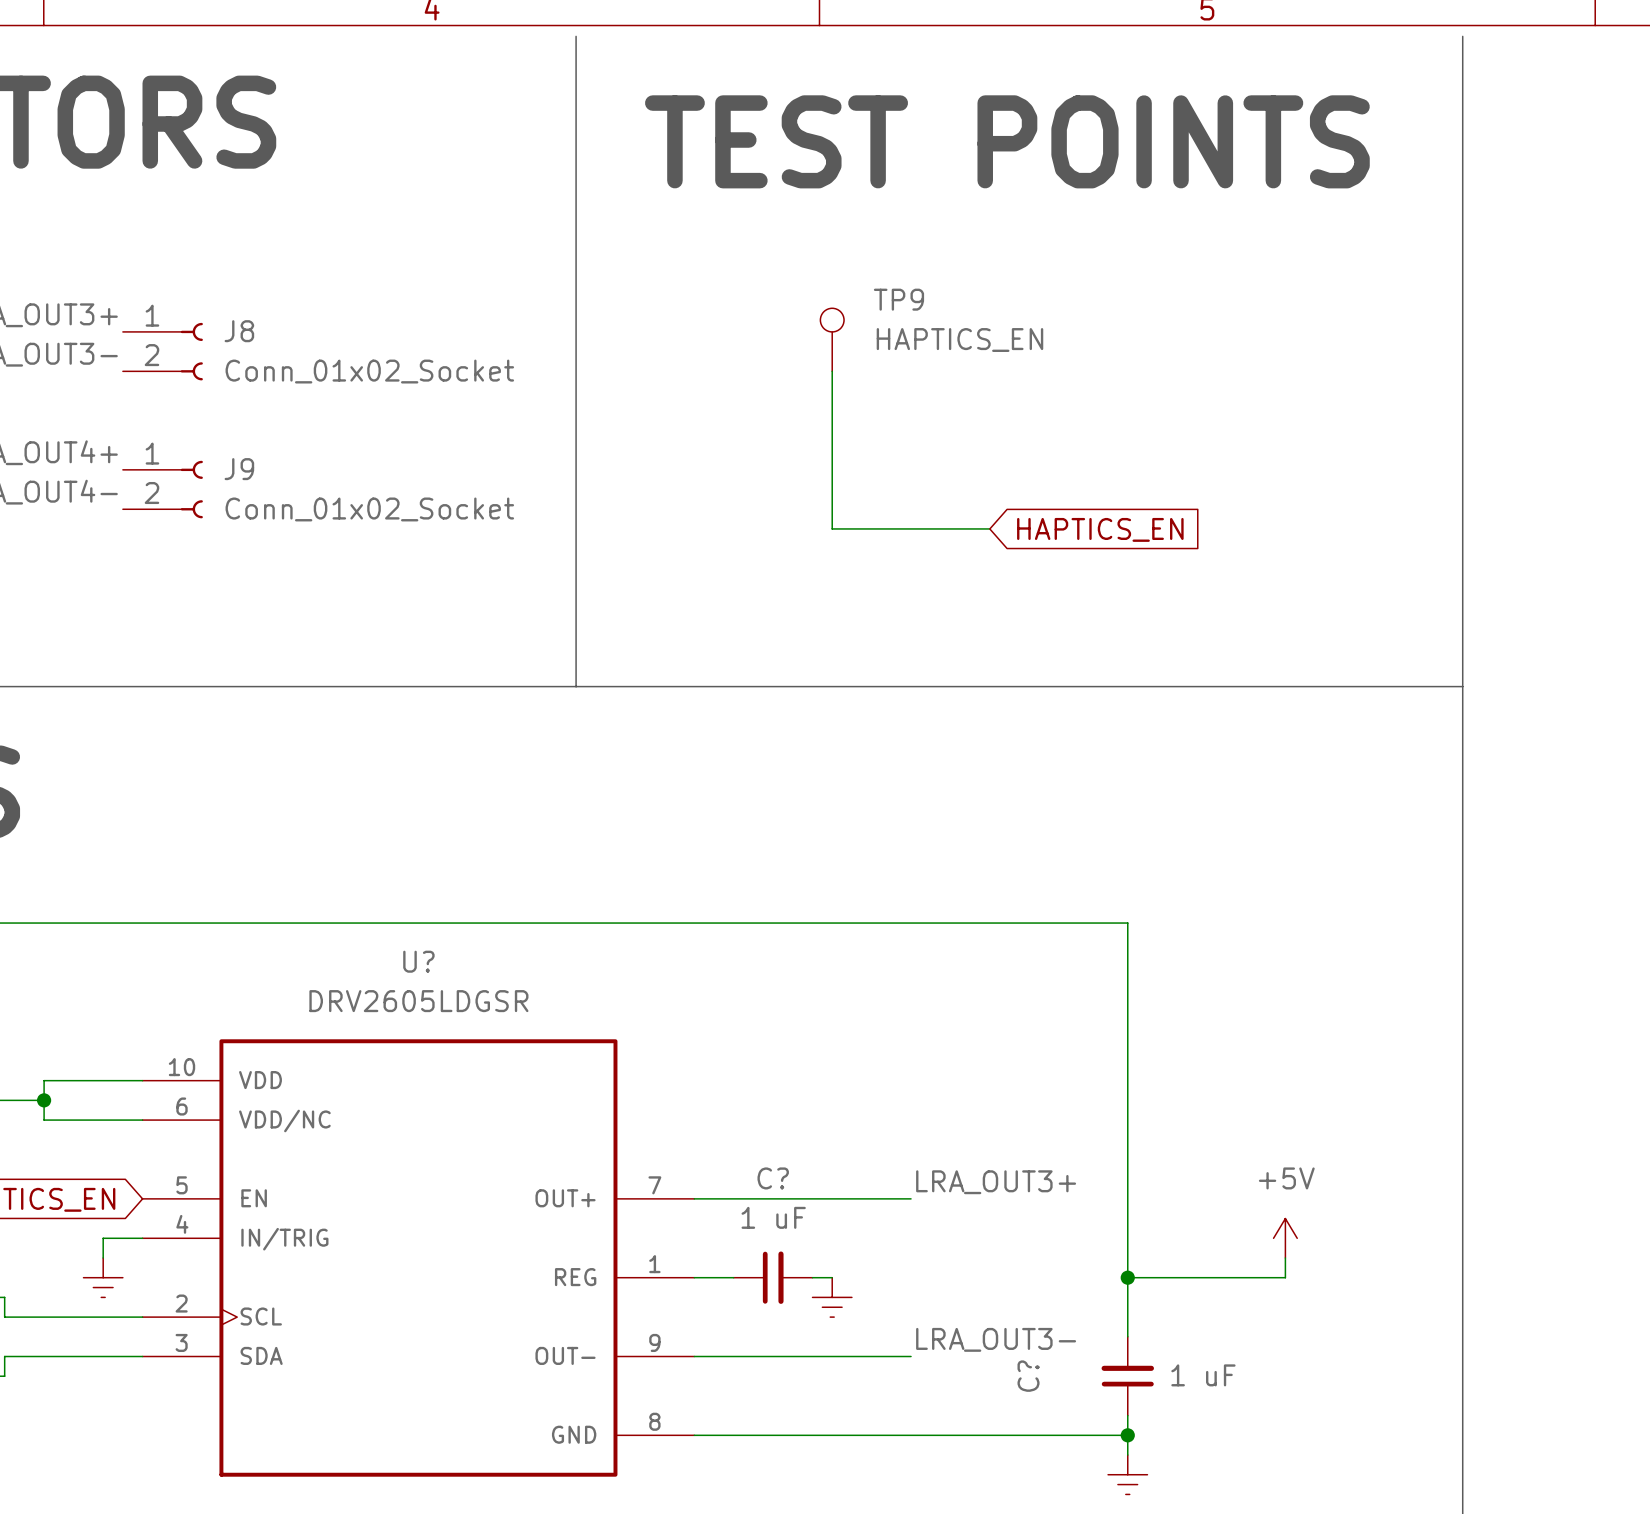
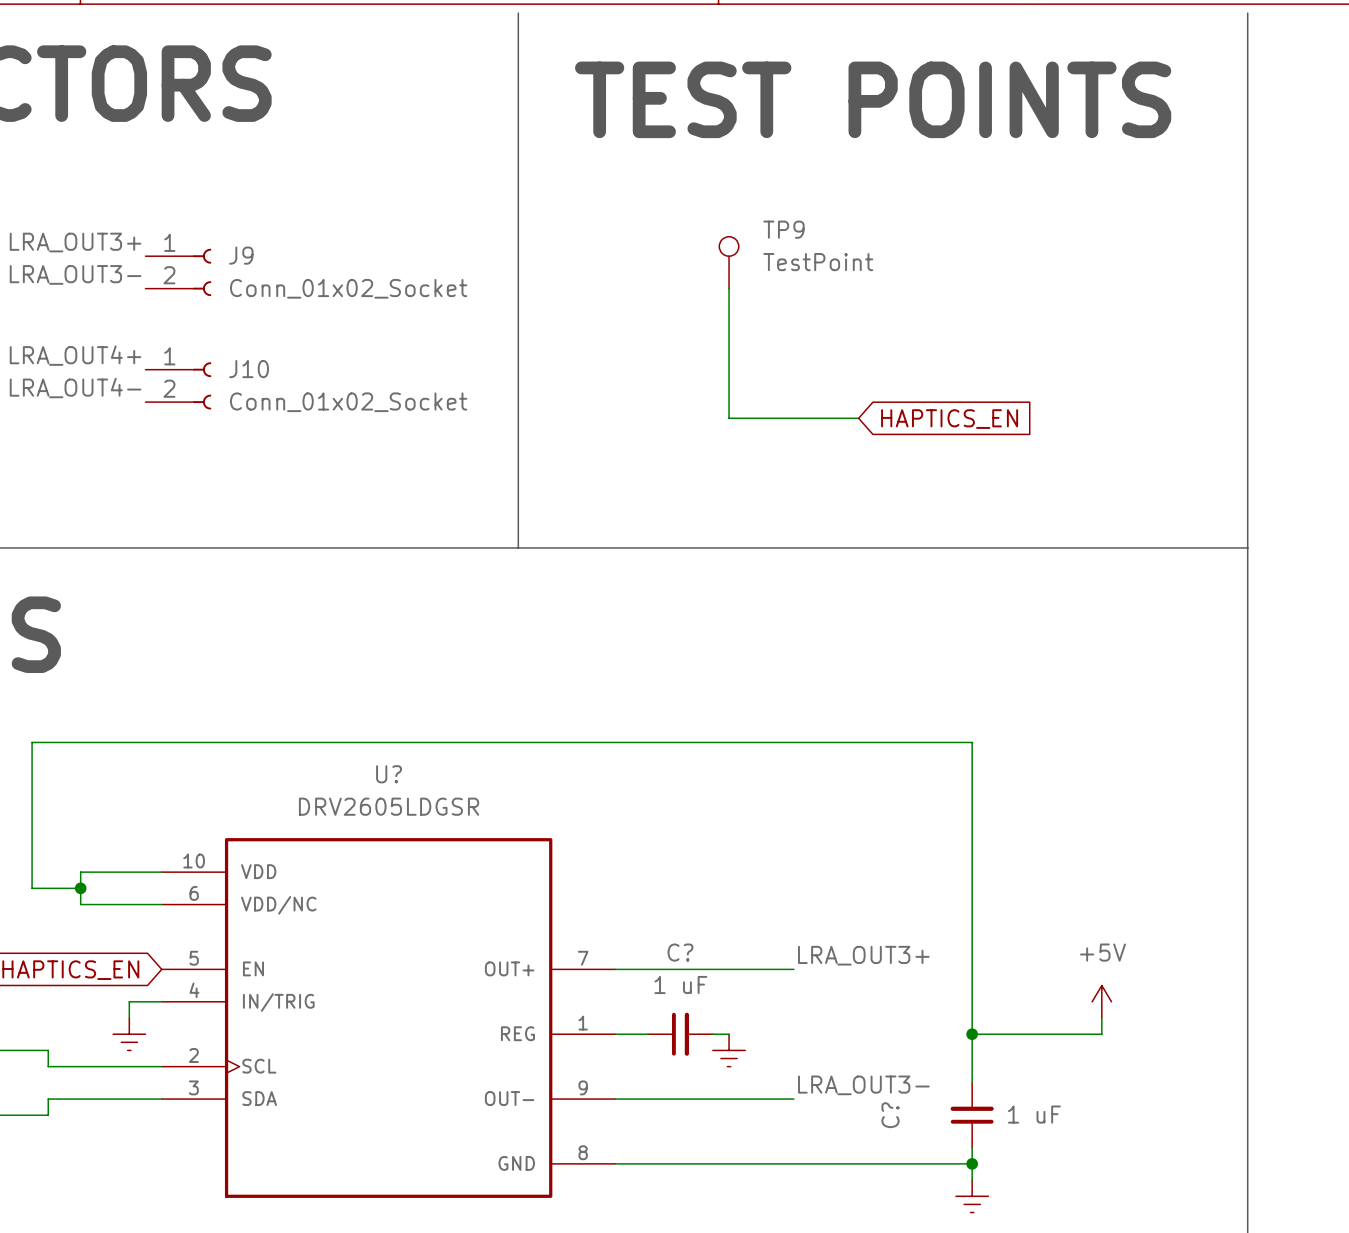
J8 name: J8 (239, 331) -> J9 (241, 255)
TP9 value: HAPTICS_EN (959, 340) -> TestPoint (818, 262)
J9 name: J9 (239, 469) -> J10 (249, 369)

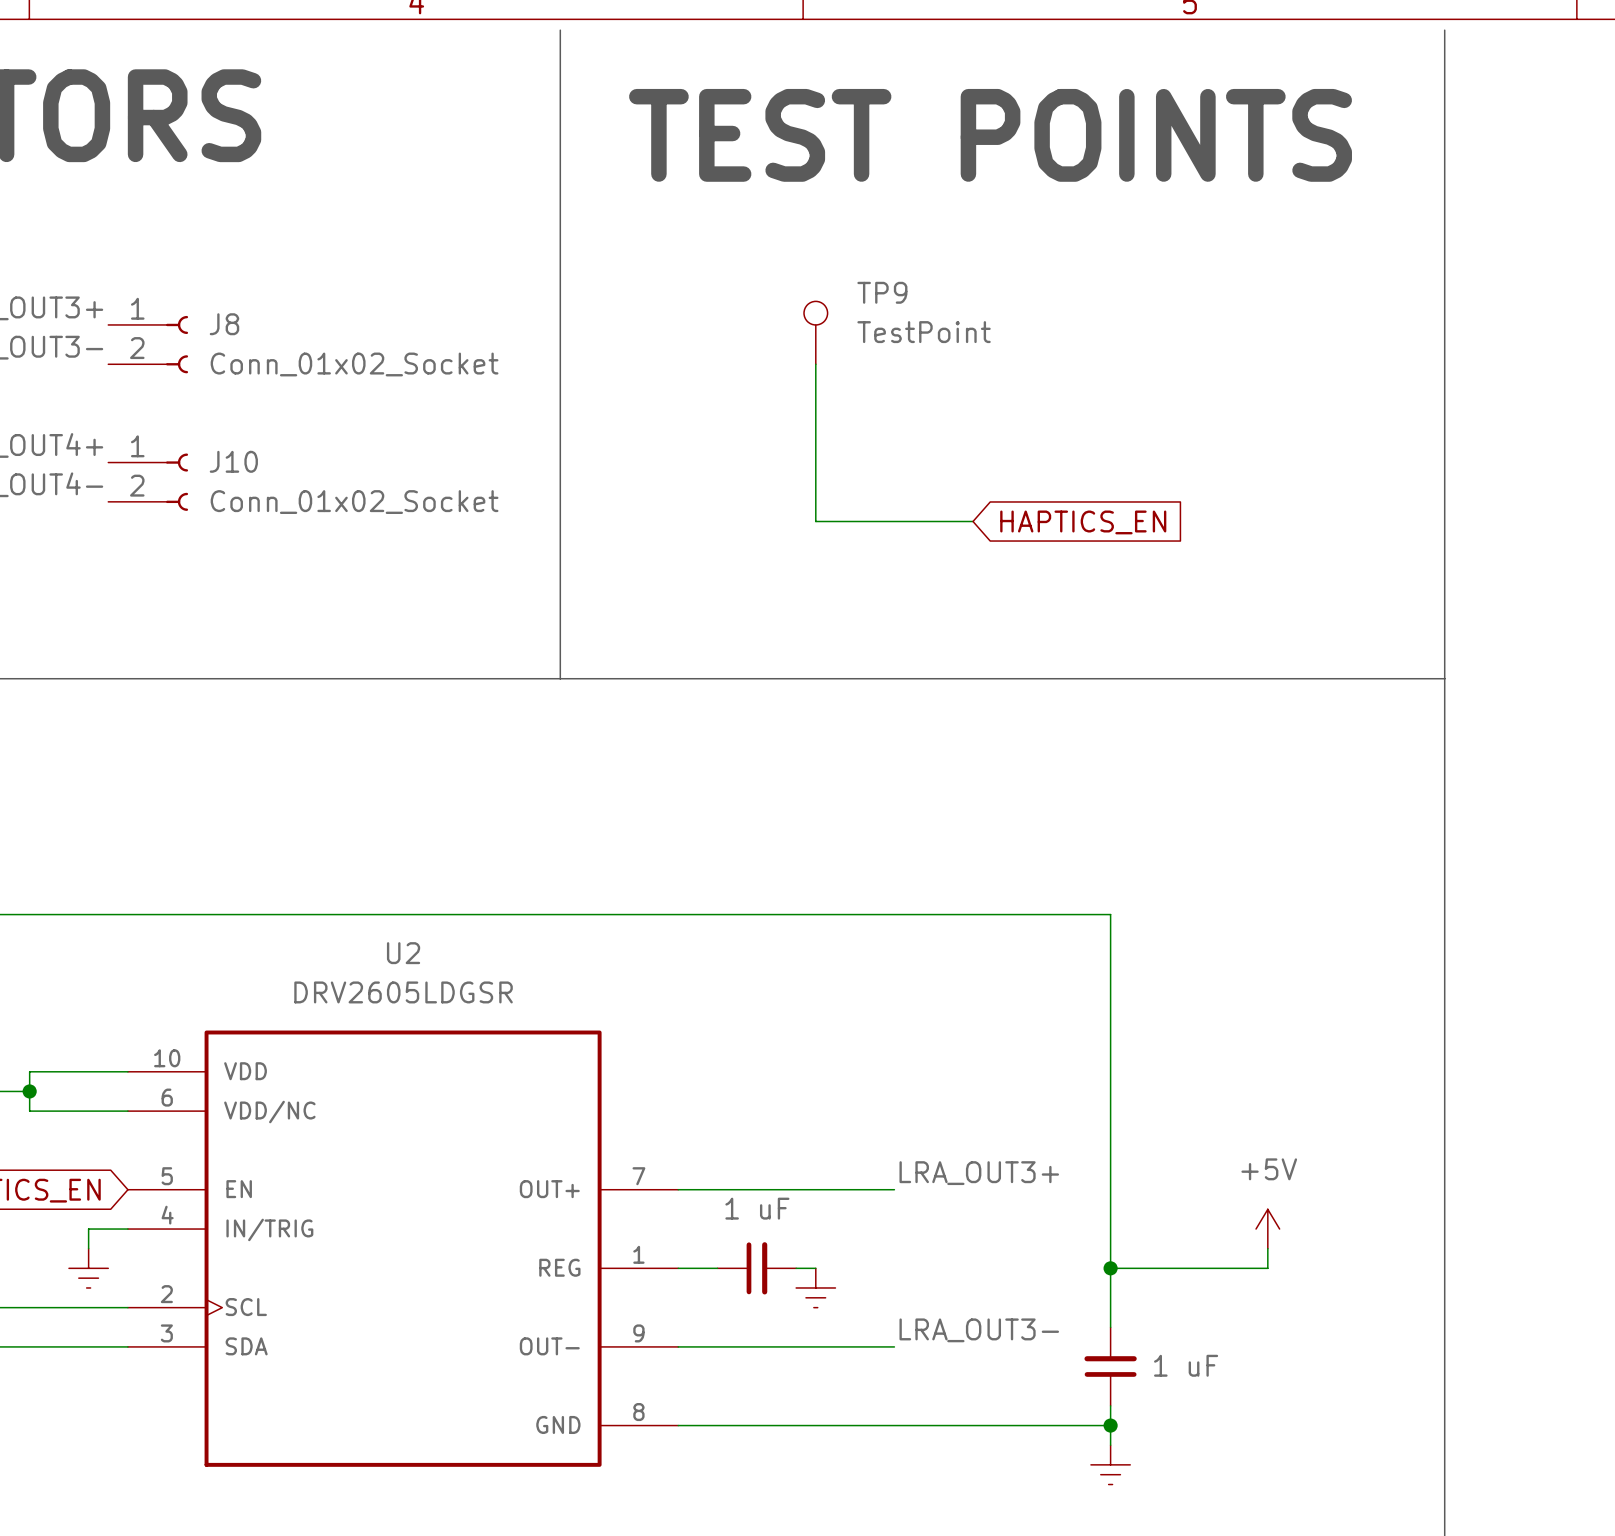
J9 name: J9 (241, 255) -> J8 (224, 324)
U? name: U? (389, 774) -> U2 (403, 953)
C? name: C? (680, 952) -> none
C? name: C? (890, 1115) -> none

